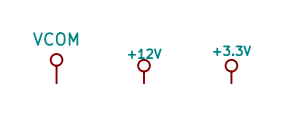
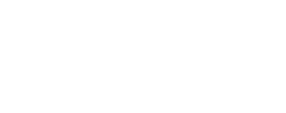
power symbol: VCOM (56, 68) -> none
power symbol: +12V (143, 71) -> none
power symbol: +3.3V (231, 71) -> none

